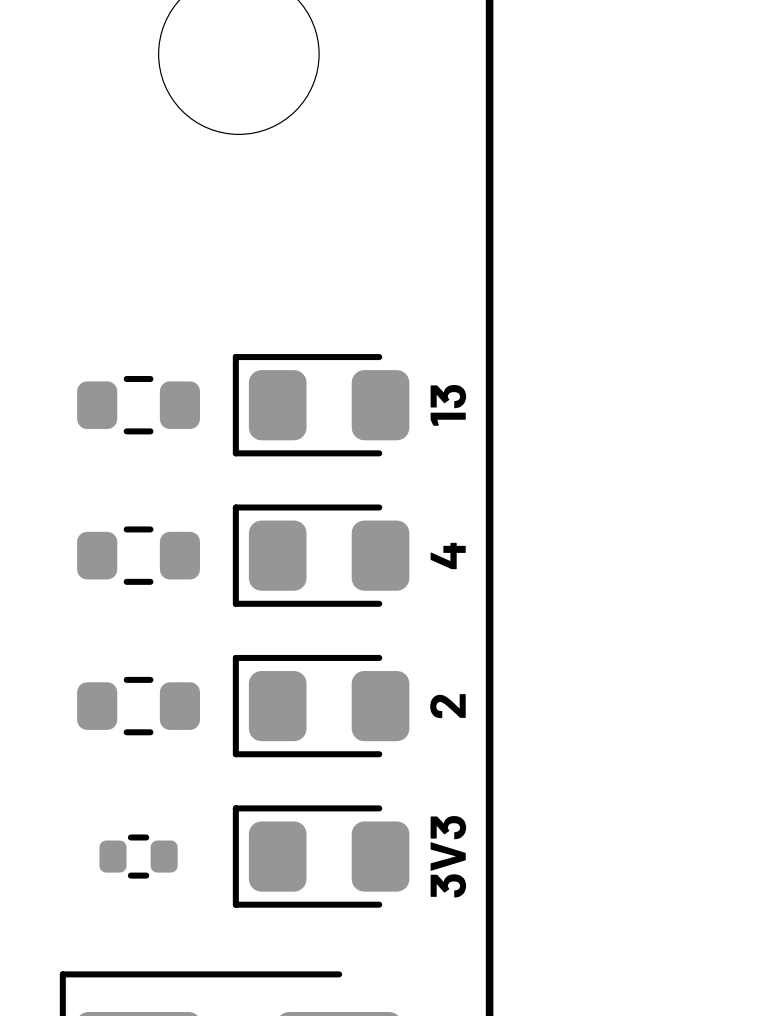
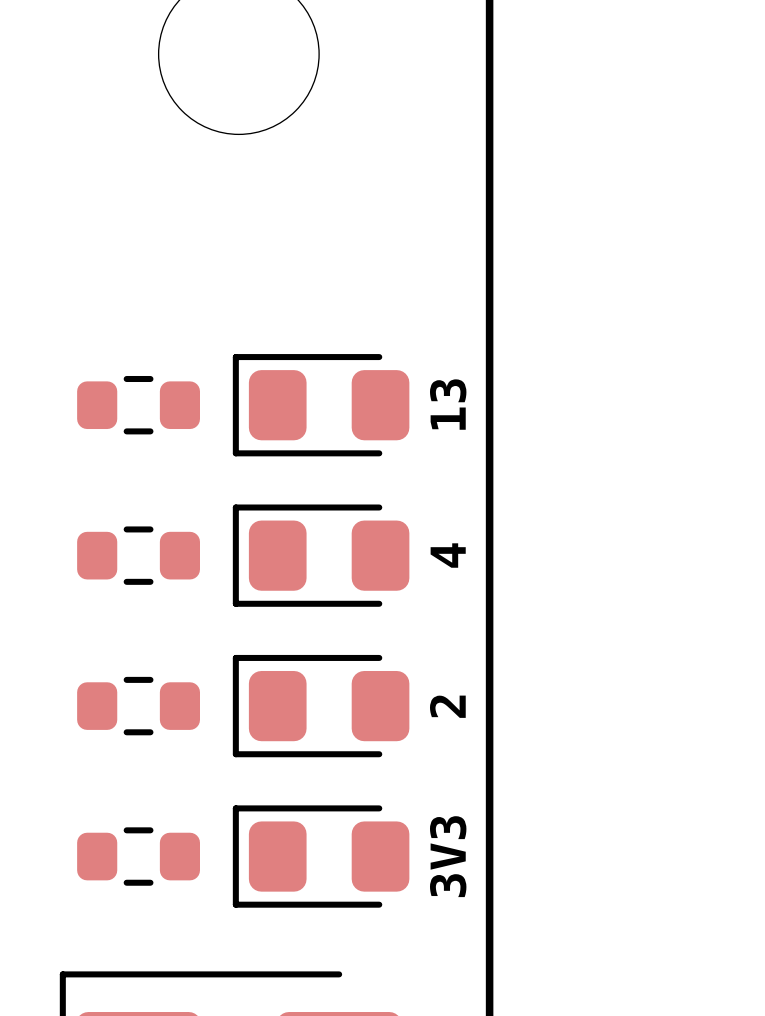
part footprint: [99, 834, 178, 879] -> [77, 827, 200, 886]

